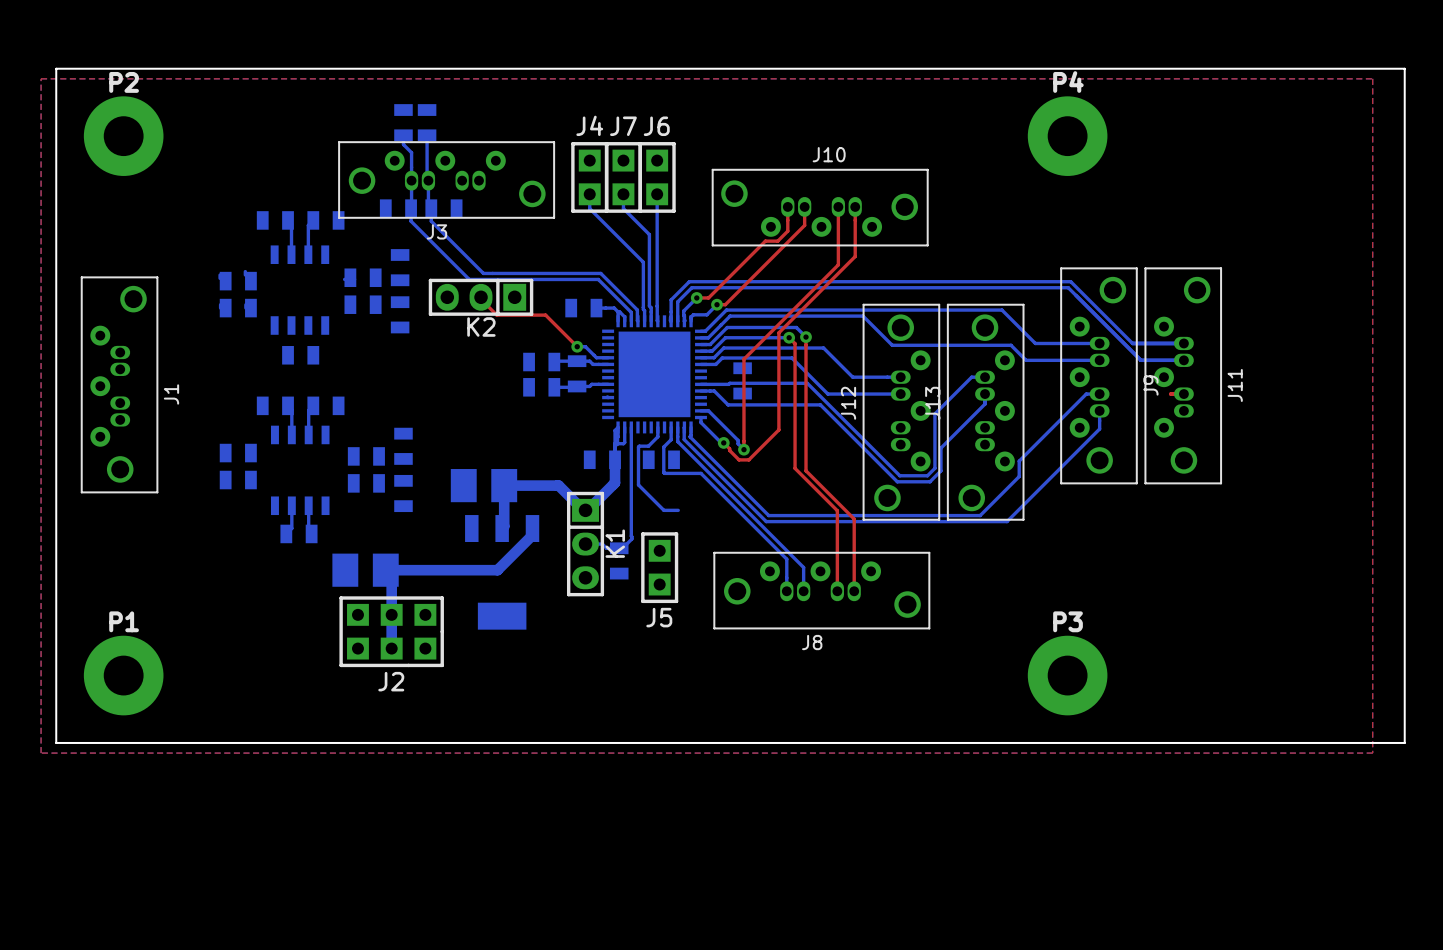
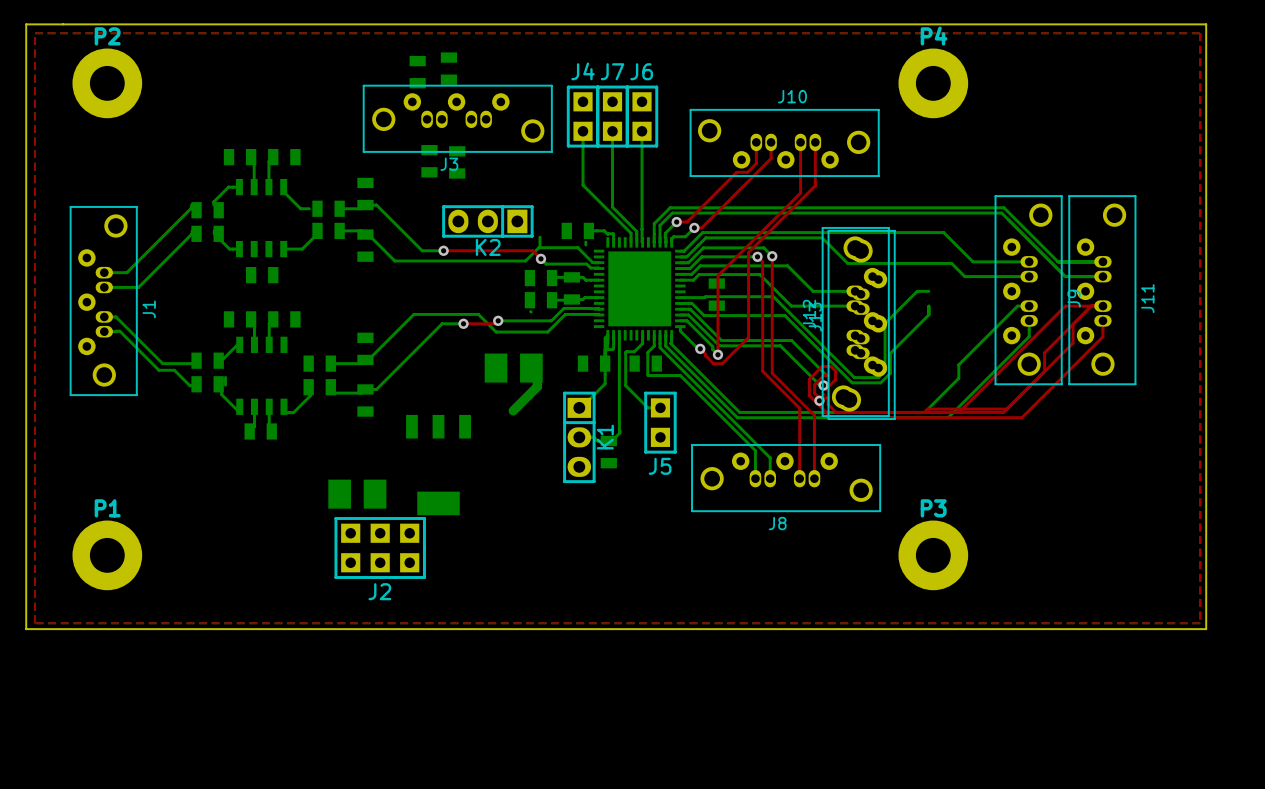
board edge: (56, 68) (56, 742) (1404, 742) (1404, 68) (1379, 68) -> (48, 24) (26, 24) (26, 629) (1206, 629) (1206, 24)
part: none -> (448, 68)
part: (403, 122) -> none
part: (427, 122) -> none
part: none -> (417, 72)
bottom track: (403, 135) (403, 144) (411, 152) (411, 221) (469, 279) (598, 279) (631, 312) (631, 321) -> none
bottom track: (427, 135) (427, 179) (431, 221) (483, 273) (600, 273) (637, 309) (637, 321) -> none
J4 position: (589, 177) -> (583, 116)
J7 position: (623, 177) -> (612, 116)
J6 position: (657, 177) -> (642, 116)
J3 position: (446, 179) -> (457, 118)
bottom track: none -> (583, 131) (583, 185) (631, 233) (631, 242)
bottom track: none -> (612, 131) (612, 207) (636, 231) (636, 242)
bottom track: (589, 194) (589, 208) (643, 262) (644, 321) -> none
bottom track: (623, 194) (623, 208) (649, 234) (651, 321) -> none
top track: (787, 206) (787, 231) (777, 241) (765, 241) (708, 297) (696, 297) -> (756, 142) (756, 163) (747, 172) (736, 172) (687, 222) (676, 222)
top track: (804, 206) (804, 225) (725, 304) (717, 304) -> (771, 142) (771, 158) (701, 227) (694, 227)
top track: (838, 206) (838, 264) (743, 359) (743, 449) -> (800, 142) (800, 193) (717, 275) (717, 354)
top track: (855, 206) (855, 256) (778, 332) (778, 429) (748, 459) (739, 459) (723, 442) -> (815, 142) (815, 185) (748, 252) (748, 337) (722, 363) (713, 363) (700, 348)
J10 position: (820, 207) -> (784, 142)
part: (398, 208) -> none
part: (443, 208) -> none
part: none -> (429, 161)
part: none -> (457, 162)
bottom track: none -> (239, 187) (228, 187) (213, 201)
bottom track: none -> (283, 191) (300, 208)
part: none -> (365, 193)
part: (400, 267) -> none
part: (363, 277) -> none
bottom track: none -> (191, 207) (126, 272) (104, 272)
part: none -> (328, 208)
bottom track: none -> (339, 208) (361, 208) (365, 205) (376, 205) (422, 250) (443, 250)
via: none -> (676, 222)
top track: (481, 297) (496, 315) (545, 315) (577, 346) -> none
K2 position: (481, 297) -> (487, 221)
bottom track: (696, 297) (683, 310) (685, 320) -> (676, 222) (665, 233) (666, 241)
via: (696, 297) -> none
via: none -> (694, 227)
bottom track: none -> (317, 230) (317, 233) (302, 249) (283, 249)
part: (363, 304) -> none
part: none -> (328, 230)
bottom track: none -> (339, 230) (361, 230) (368, 234) (394, 261) (525, 261) (538, 247) (577, 247) (592, 262) (599, 262)
part: none -> (577, 230)
bottom track: none -> (588, 230) (604, 230) (607, 234) (613, 233) (613, 242)
bottom track: (717, 304) (706, 314) (693, 314) (691, 321) -> (694, 227) (685, 236) (673, 236) (671, 242)
via: (717, 304) -> none
bottom track: none -> (192, 233) (138, 287) (104, 287)
bottom track: none -> (214, 233) (229, 249) (239, 249)
part: (583, 308) -> none
bottom track: (596, 308) (614, 308) (624, 316) (624, 321) -> none
part: (400, 314) -> none
part footprint: [602, 315, 707, 434] -> [563, 272, 581, 305]
bottom track: (670, 320) (671, 299) (689, 281) (1070, 281) (1132, 343) (1183, 343) -> (653, 242) (654, 223) (670, 207) (1003, 207) (1058, 261) (1102, 261)
part: none -> (365, 245)
bottom track: (677, 321) (677, 301) (691, 287) (1068, 287) (1140, 360) (1183, 360) -> (660, 242) (660, 225) (672, 213) (1001, 213) (1065, 276) (1102, 276)
top track: none -> (443, 250) (532, 250) (540, 258)
via: none -> (443, 250)
bottom track: (700, 331) (705, 331) (726, 310) (1001, 310) (1035, 343) (1099, 343) -> (680, 251) (684, 251) (702, 232) (943, 232) (972, 261) (1029, 261)
via: none -> (772, 256)
via: none -> (757, 256)
bottom track: none -> (540, 258) (546, 264) (586, 264) (590, 267) (599, 268)
via: none -> (540, 258)
bottom track: (700, 337) (708, 337) (730, 316) (863, 316) (892, 345) (1011, 345) (1026, 360) (1099, 360) -> (680, 256) (686, 256) (705, 237) (822, 237) (847, 263) (951, 263) (964, 276) (1029, 276)
bottom track: (789, 337) (725, 337) (712, 351) (701, 351) -> (757, 256) (701, 256) (690, 268) (680, 268)
top track: (789, 337) (795, 343) (795, 468) (837, 510) (837, 591) -> (757, 256) (762, 261) (762, 371) (799, 408) (799, 478)
via: (789, 337) -> none
bottom track: (806, 337) (796, 327) (727, 327) (710, 344) (701, 344) -> (772, 256) (763, 247) (703, 247) (688, 262) (680, 262)
top track: (806, 337) (806, 470) (854, 519) (854, 591) -> (772, 256) (772, 373) (814, 415) (814, 478)
via: (806, 337) -> none
bottom track: (577, 346) (585, 346) (596, 357) (608, 357) -> none
via: (577, 346) -> none
bottom track: (701, 357) (714, 357) (723, 348) (823, 348) (852, 377) (900, 377) -> (680, 274) (691, 274) (700, 265) (787, 265) (813, 291) (855, 291)
part: none -> (540, 278)
part: (541, 362) -> none
bottom track: (554, 362) (589, 361) (592, 364) (608, 364) -> (552, 278) (583, 277) (585, 280) (599, 280)
bottom track: (701, 364) (715, 364) (722, 358) (791, 358) (827, 394) (900, 394) -> (680, 280) (693, 280) (699, 274) (759, 274) (791, 306) (855, 306)
part: none -> (639, 288)
part: (577, 373) -> none
J9 position: (1098, 375) -> (1028, 290)
J11 position: (1183, 375) -> (1102, 290)
part: none -> (716, 294)
bottom track: (985, 377) (971, 377) (934, 413) (934, 468) (927, 475) (899, 475) (807, 383) (701, 384) -> (928, 291) (917, 291) (885, 323) (885, 371) (878, 377) (854, 377) (773, 296) (680, 297)
part: (742, 380) -> none
part: none -> (540, 300)
bottom track: (608, 384) (554, 387) -> (599, 297) (552, 300)
part: (541, 387) -> none
top track: none -> (1091, 306) (1044, 352) (1044, 371)
top track: none -> (1102, 306) (1065, 306) (958, 412)
bottom track: (700, 391) (714, 391) (728, 404) (820, 404) (897, 481) (930, 481) (940, 470) (940, 448) (985, 404) (985, 394) -> (680, 303) (691, 303) (704, 315) (784, 315) (852, 382) (880, 382) (890, 373) (890, 353) (928, 314) (928, 306)
bottom track: none -> (599, 309) (563, 308) (551, 320) (498, 320)
bottom track: none -> (680, 309) (690, 309) (721, 340) (791, 340) (826, 375)
bottom track: (1099, 394) (1086, 394) (1019, 461) (1019, 476) (980, 515) (768, 515) (690, 437) (691, 427) -> (1029, 306) (1017, 306) (958, 364) (958, 378) (924, 412) (739, 412) (670, 343) (671, 335)
bottom track: none -> (599, 314) (565, 314) (547, 332) (496, 332) (478, 314) (413, 314) (368, 359) (361, 363) (332, 363)
bottom track: none -> (680, 315) (688, 315) (719, 345) (780, 345) (823, 388)
bottom track: none -> (104, 316) (115, 316) (162, 363) (199, 363)
top track: none -> (498, 320) (495, 323) (463, 323)
via: none -> (498, 320)
top track: none -> (1102, 320) (1102, 336) (1021, 417) (831, 417) (809, 395) (809, 379) (822, 366) (830, 366) (835, 371) (835, 379) (826, 388) (823, 388)
bottom track: none -> (463, 323) (442, 323) (376, 389) (365, 389) (361, 393) (332, 393)
via: none -> (463, 323)
bottom track: (700, 410) (708, 410) (738, 440) (738, 443) (743, 449) -> (680, 320) (686, 320) (712, 346) (712, 349) (717, 354)
bottom track: (1099, 410) (1099, 429) (1007, 521) (766, 521) (684, 439) (684, 427) -> (1029, 320) (1029, 336) (948, 417) (737, 417) (665, 345) (665, 335)
top track: none -> (1073, 324) (1073, 343) (1003, 412) (836, 412) (828, 404) (827, 397) (819, 397) (814, 393) (814, 384) (823, 375) (826, 375)
J12 position: (901, 412) -> (855, 322)
bottom track: (700, 417) (700, 422) (721, 442) (723, 442) -> (680, 326) (680, 331) (700, 348)
bottom track: none -> (104, 331) (119, 331) (158, 370) (174, 370) (189, 385) (199, 385)
bottom track: (624, 427) (624, 442) (615, 443) -> (613, 335) (613, 348) (605, 349)
bottom track: (631, 427) (631, 539) (622, 548) (606, 548) (602, 544) (585, 544) -> (619, 335) (619, 432) (611, 441) (597, 441) (594, 437) (579, 437)
bottom track: (657, 427) (657, 436) (648, 446) (638, 447) (638, 484) (663, 510) (678, 510) -> (642, 335) (642, 343) (634, 351) (625, 352) (625, 385) (647, 407) (660, 407)
bottom track: (671, 427) (671, 439) (663, 447) (663, 472) (701, 473) (786, 559) (786, 591) -> (654, 335) (654, 346) (647, 352) (647, 374) (680, 375) (755, 450) (755, 478)
bottom track: (677, 427) (677, 441) (803, 567) (803, 591) -> (660, 335) (660, 347) (770, 457) (770, 478)
bottom track: none -> (239, 342) (221, 360)
via: none -> (700, 348)
bottom track: none -> (605, 351) (607, 349) (607, 335) (605, 337) (605, 383) (579, 407)
via: (723, 442) -> none
part position: (403, 446) -> (365, 348)
bottom track: (615, 446) (617, 443) (618, 427) (615, 430) (615, 482) -> none
via: none -> (717, 354)
via: (743, 449) -> none
part: none -> (645, 363)
part: (602, 459) -> none
part position: (661, 459) -> (594, 363)
part: none -> (513, 368)
bottom track: none -> (225, 377) (225, 385)
via: none -> (823, 385)
bottom track: none -> (221, 388) (221, 394) (239, 412)
part: (483, 485) -> none
bottom track: none -> (310, 393) (310, 396) (293, 412) (283, 412)
top track: none -> (823, 394) (823, 394)
part position: (403, 493) -> (365, 400)
via: none -> (819, 400)
top track: none -> (1007, 409) (928, 409) (924, 412)
bottom track: (585, 510) (587, 510) (583, 510) (558, 485) (504, 485) (504, 526) -> none
bottom track: (532, 528) (532, 535) (497, 570) (385, 570) (391, 576) (391, 648) -> none
K1 position: (585, 544) -> (579, 437)
part: none -> (608, 452)
part: (619, 560) -> none
J5 position: (659, 567) -> (660, 422)
part position: (365, 570) -> (357, 494)
J8 position: (821, 590) -> (786, 478)
J2 position: (391, 631) -> (380, 547)

